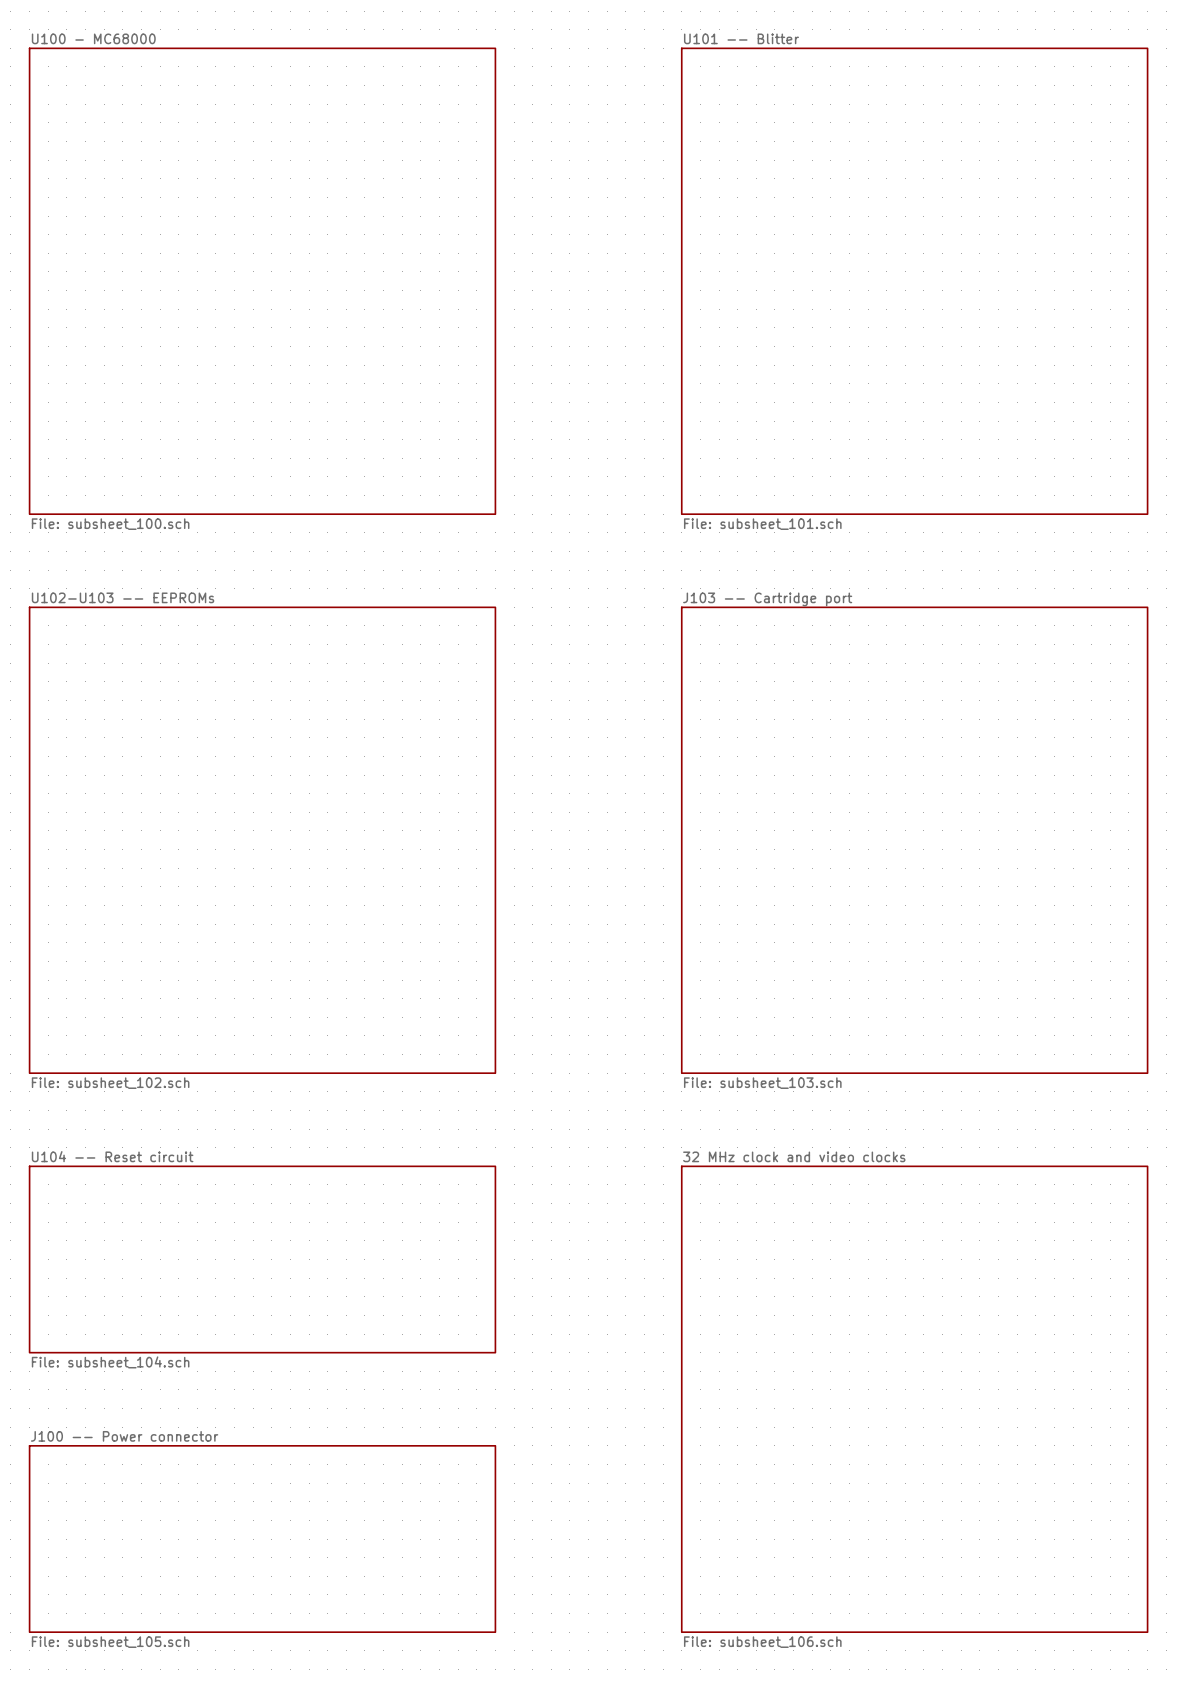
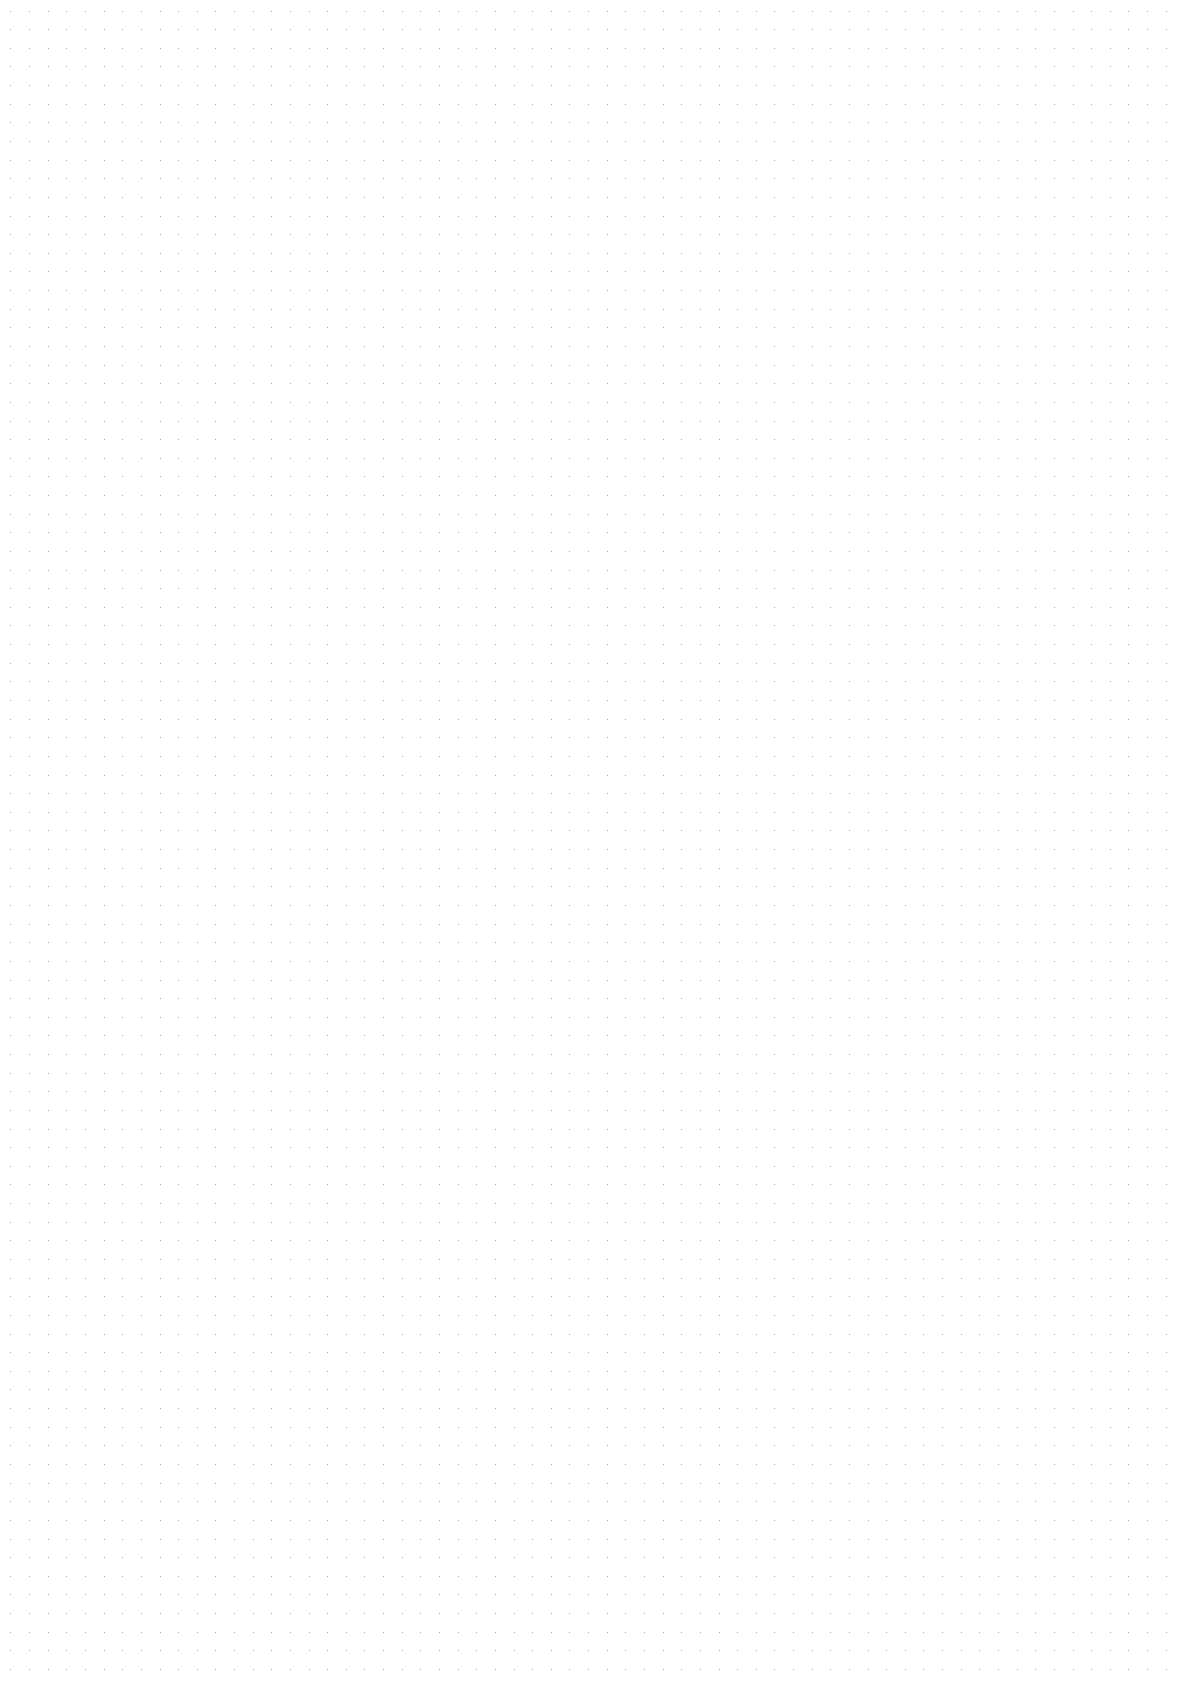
sheet U100 - MC68000: File: subsheet_100.sch (262, 281) -> none
sheet U101 -- Blitter: File: subsheet_101.sch (914, 281) -> none
sheet U102-U103 -- EEPROMs: File: subsheet_102.sch (262, 840) -> none
sheet J103 -- Cartridge port: File: subsheet_103.sch (914, 840) -> none
sheet U104 -- Reset circuit: File: subsheet_104.sch (262, 1259) -> none
sheet 32 MHz clock and video clocks: File: subsheet_106.sch (914, 1399) -> none
sheet J100 -- Power connector: File: subsheet_105.sch (262, 1539) -> none

